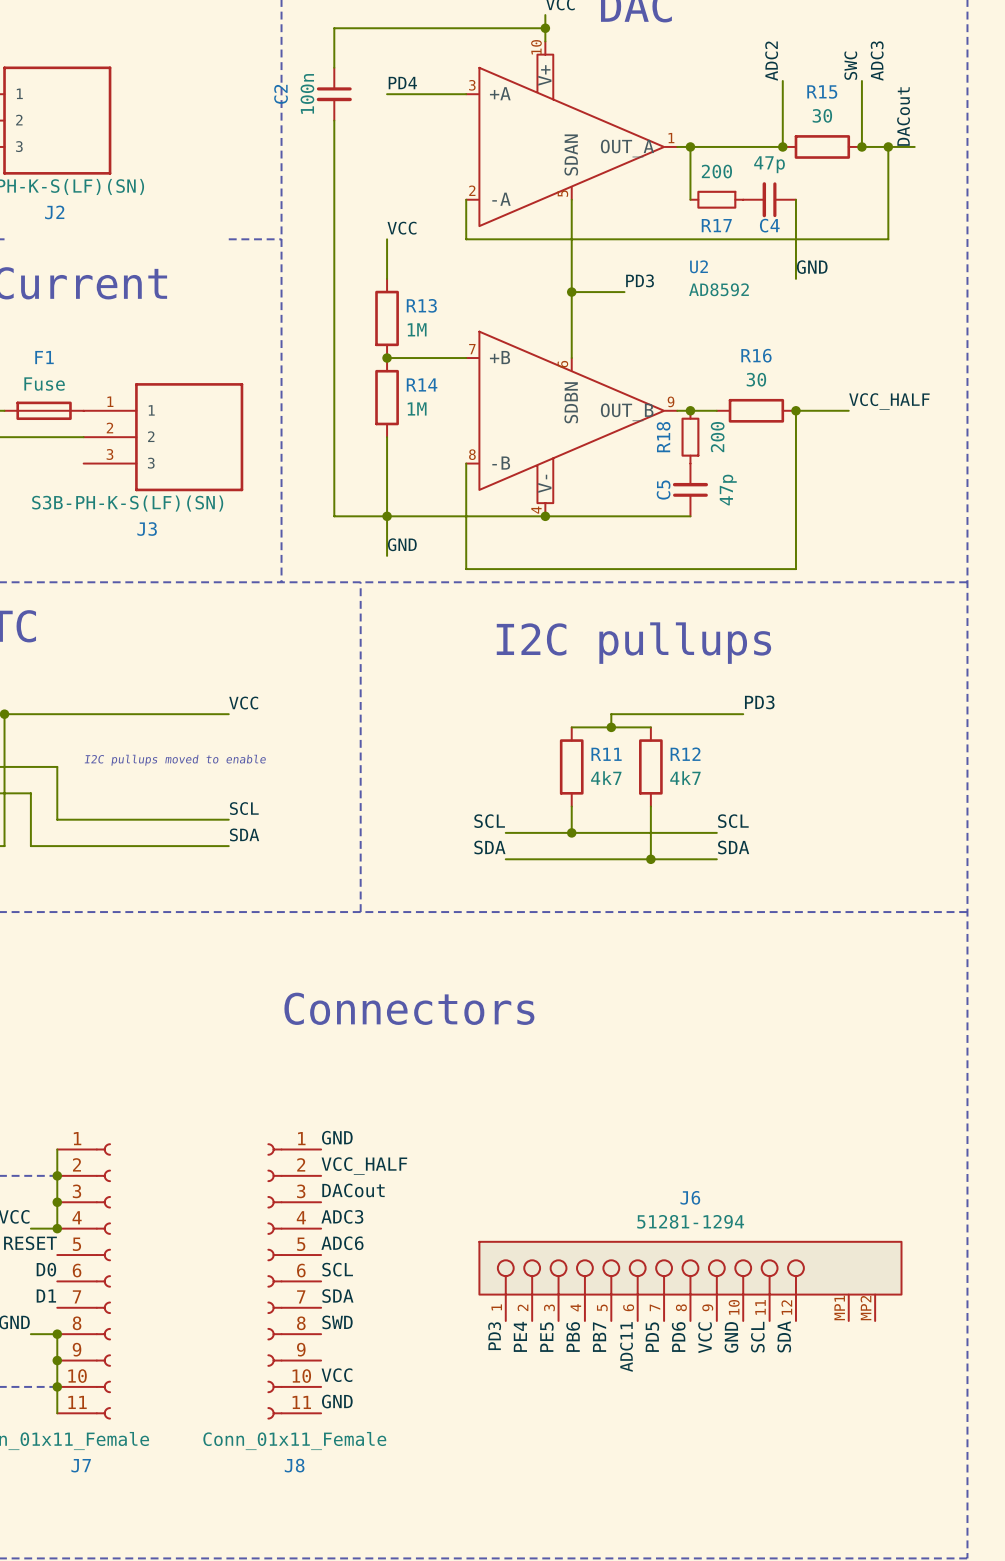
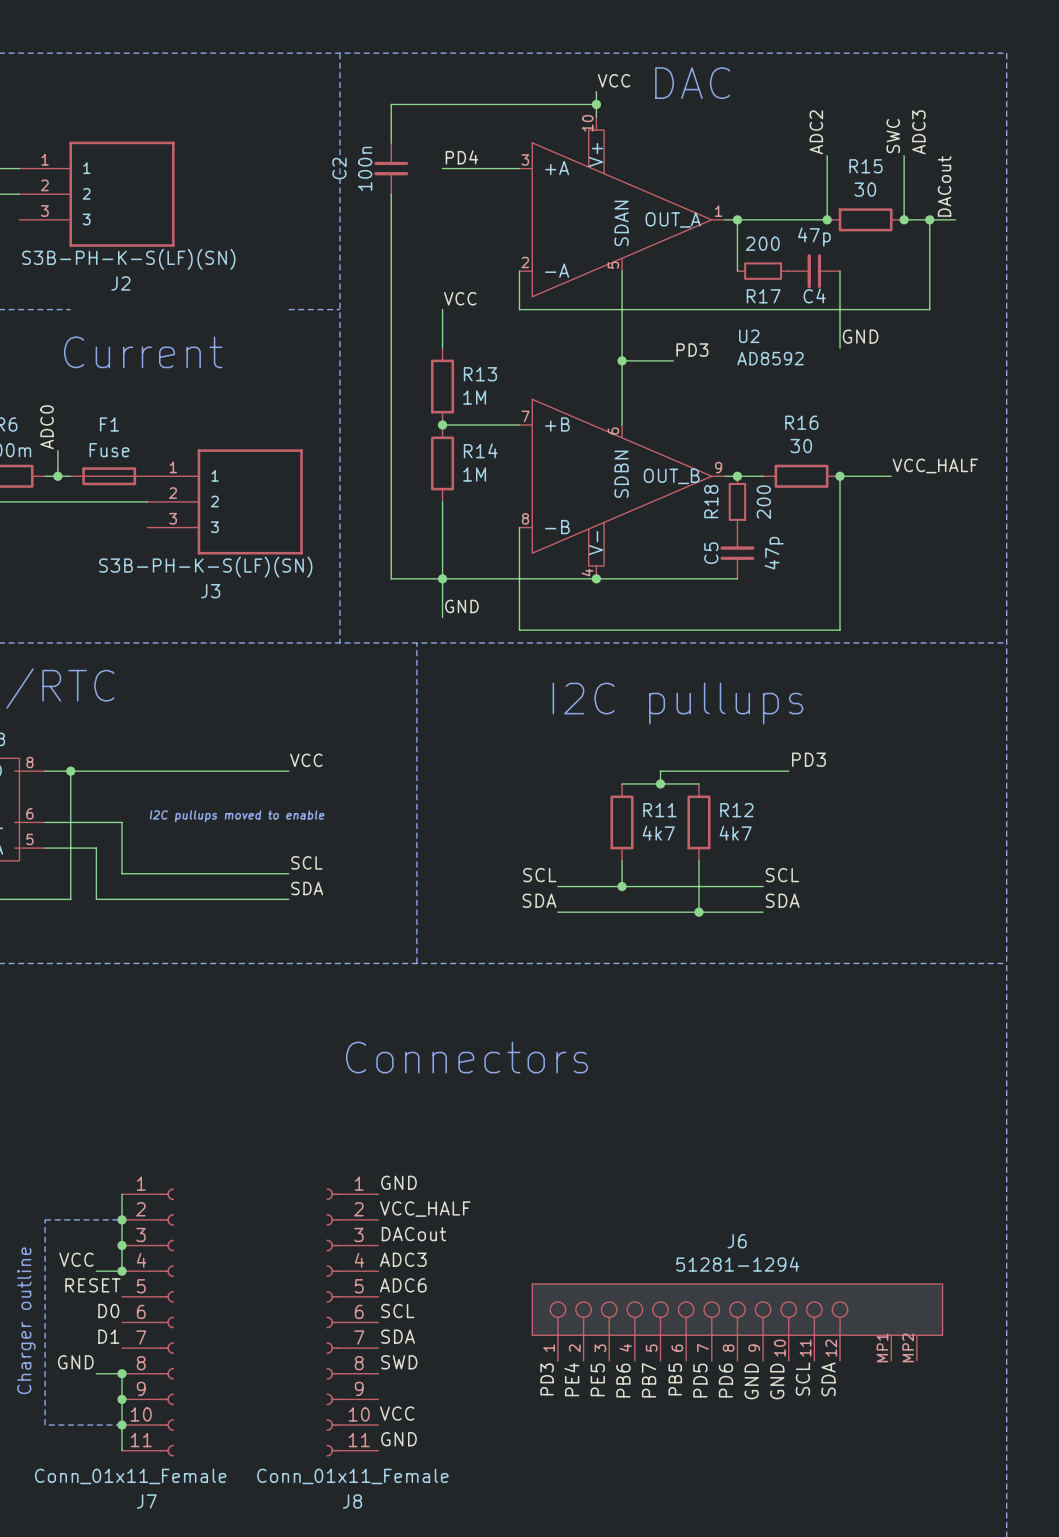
label: VCC (705, 1337) -> GND (751, 1381)
label: ADC11 (626, 1346) -> PB5 (675, 1379)

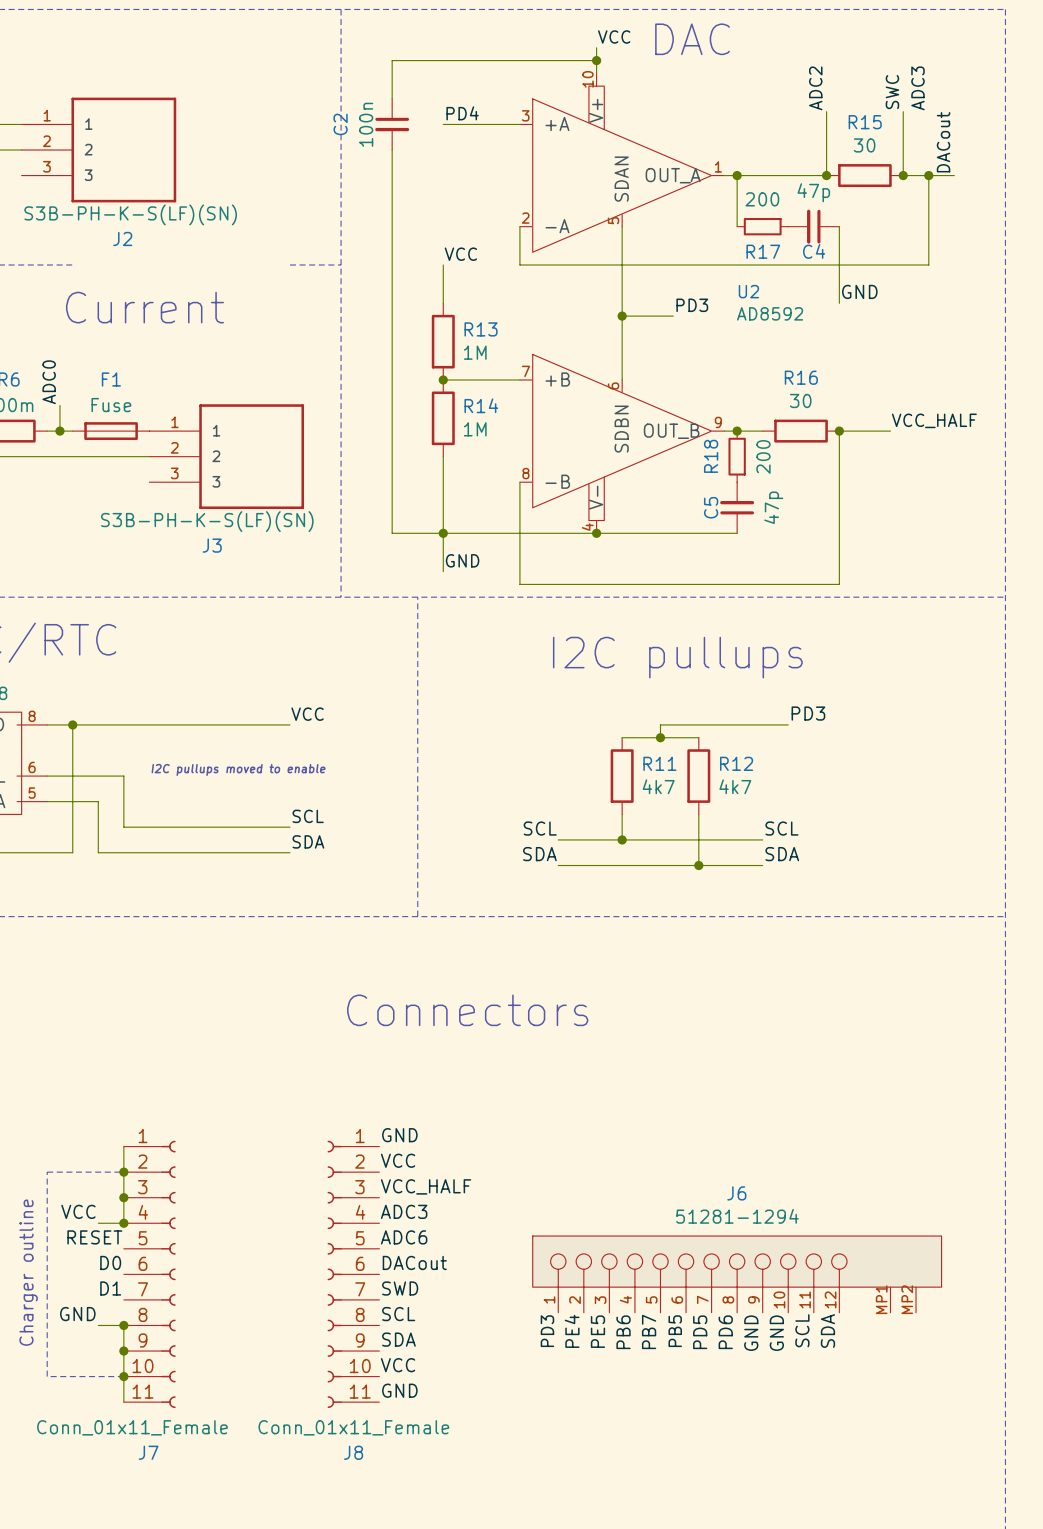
label: VCC_HALF (425, 1209) -> VCC (398, 1160)
label: DACout (413, 1234) -> VCC_HALF (426, 1186)
label: SCL (397, 1311) -> DACout (414, 1262)
label: SDA (398, 1336) -> SWD (400, 1288)
label: SWD (399, 1362) -> SCL (398, 1314)
label: none -> SDA (398, 1339)

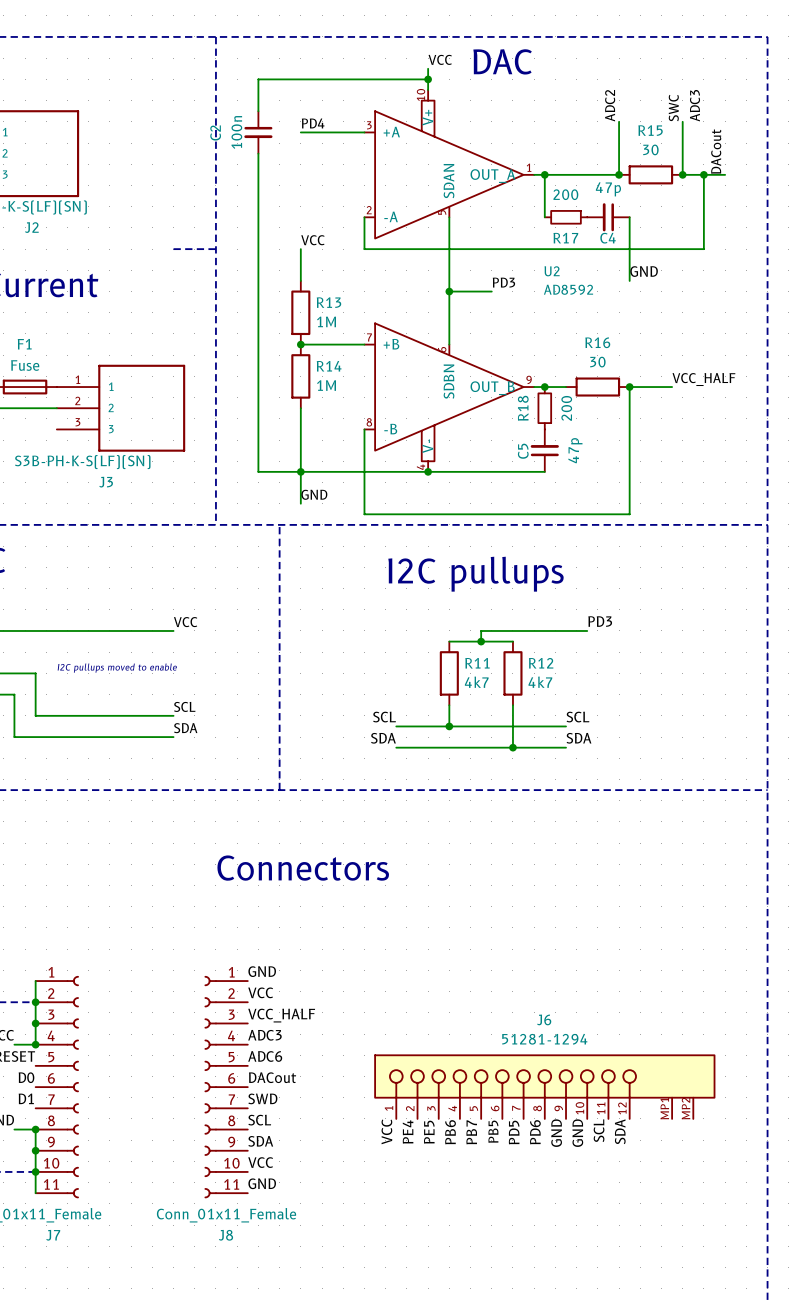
label: PD3 (547, 1331) -> VCC (386, 1131)

